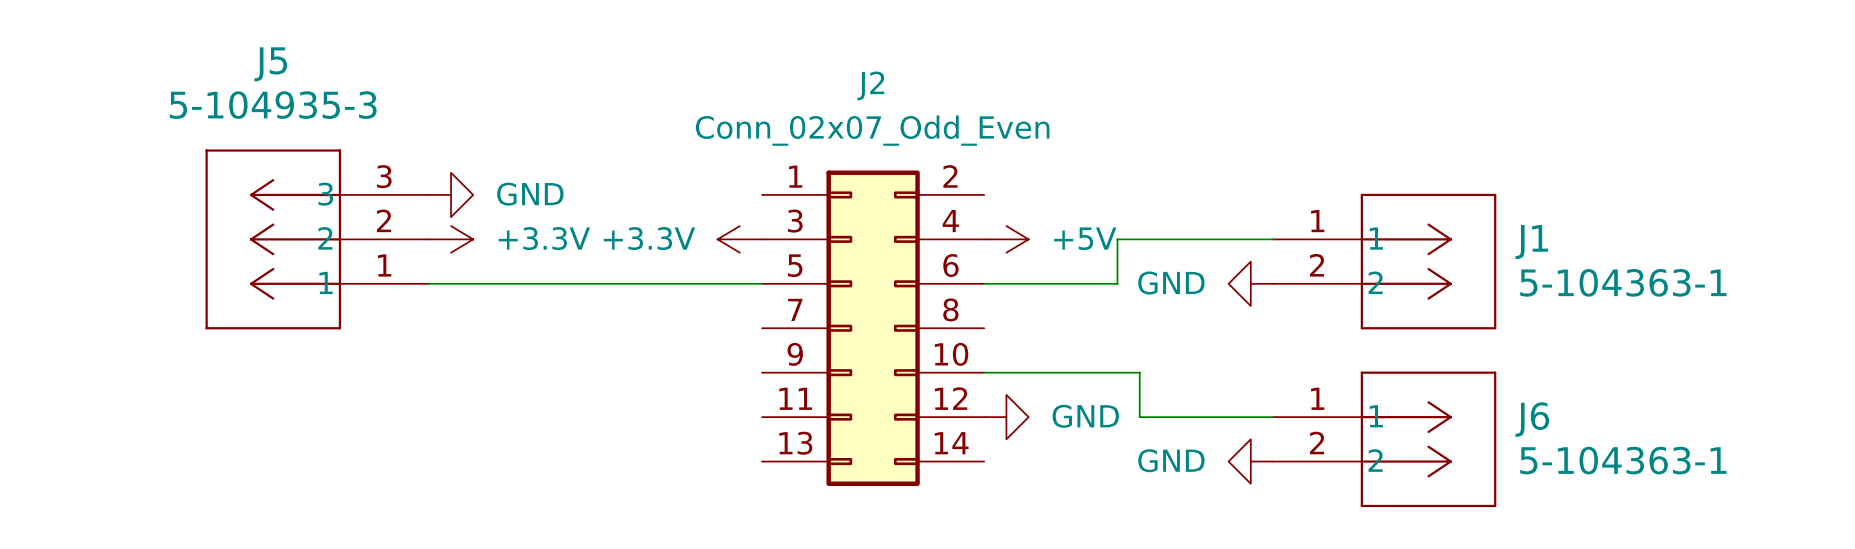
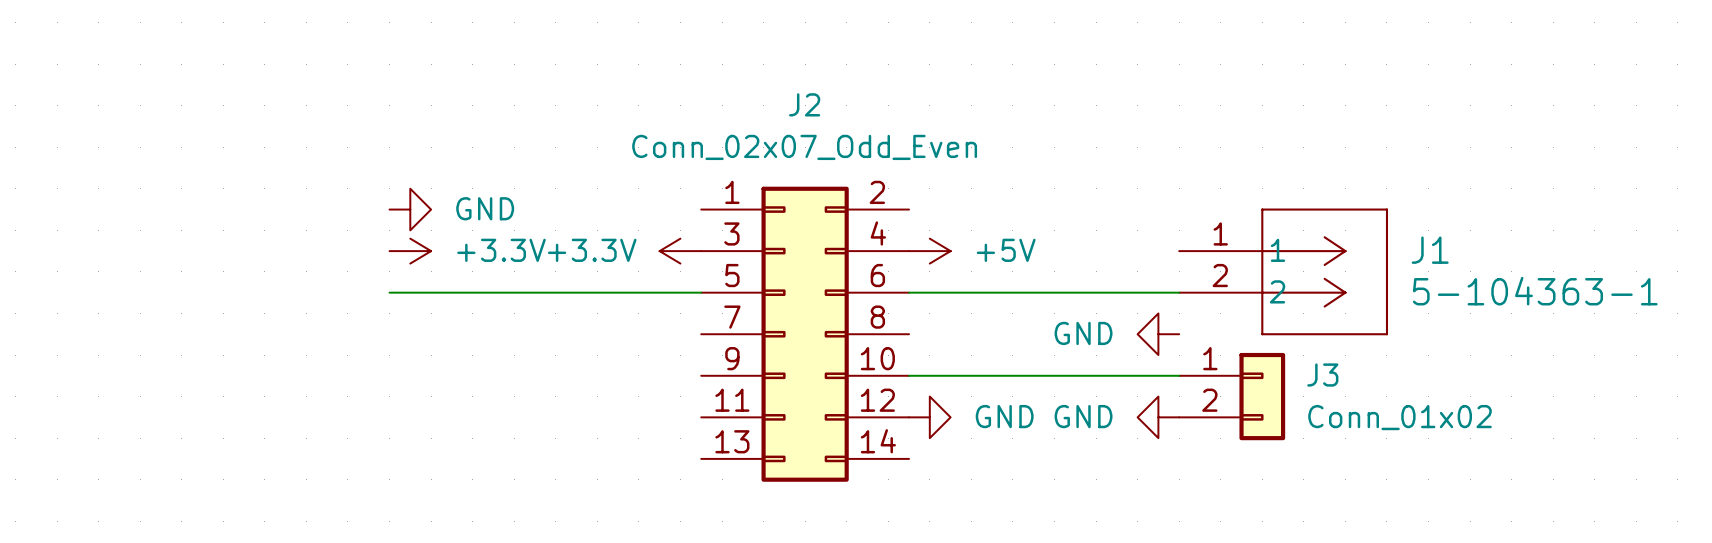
J5: 5-104935-3 (317, 239) -> none
wire: (1273, 239) (1117, 239) (1117, 283) -> (1179, 292) (1033, 292)
power symbol position: GND (1250, 283) -> GND (1158, 334)
wire: (1139, 372) (1139, 417) (1273, 417) -> (1054, 375) (1179, 375)
J3: none -> Conn_01x02 (1232, 396)
J6: 5-104363-1 (1384, 439) -> none
power symbol position: GND (1250, 461) -> GND (1158, 417)

